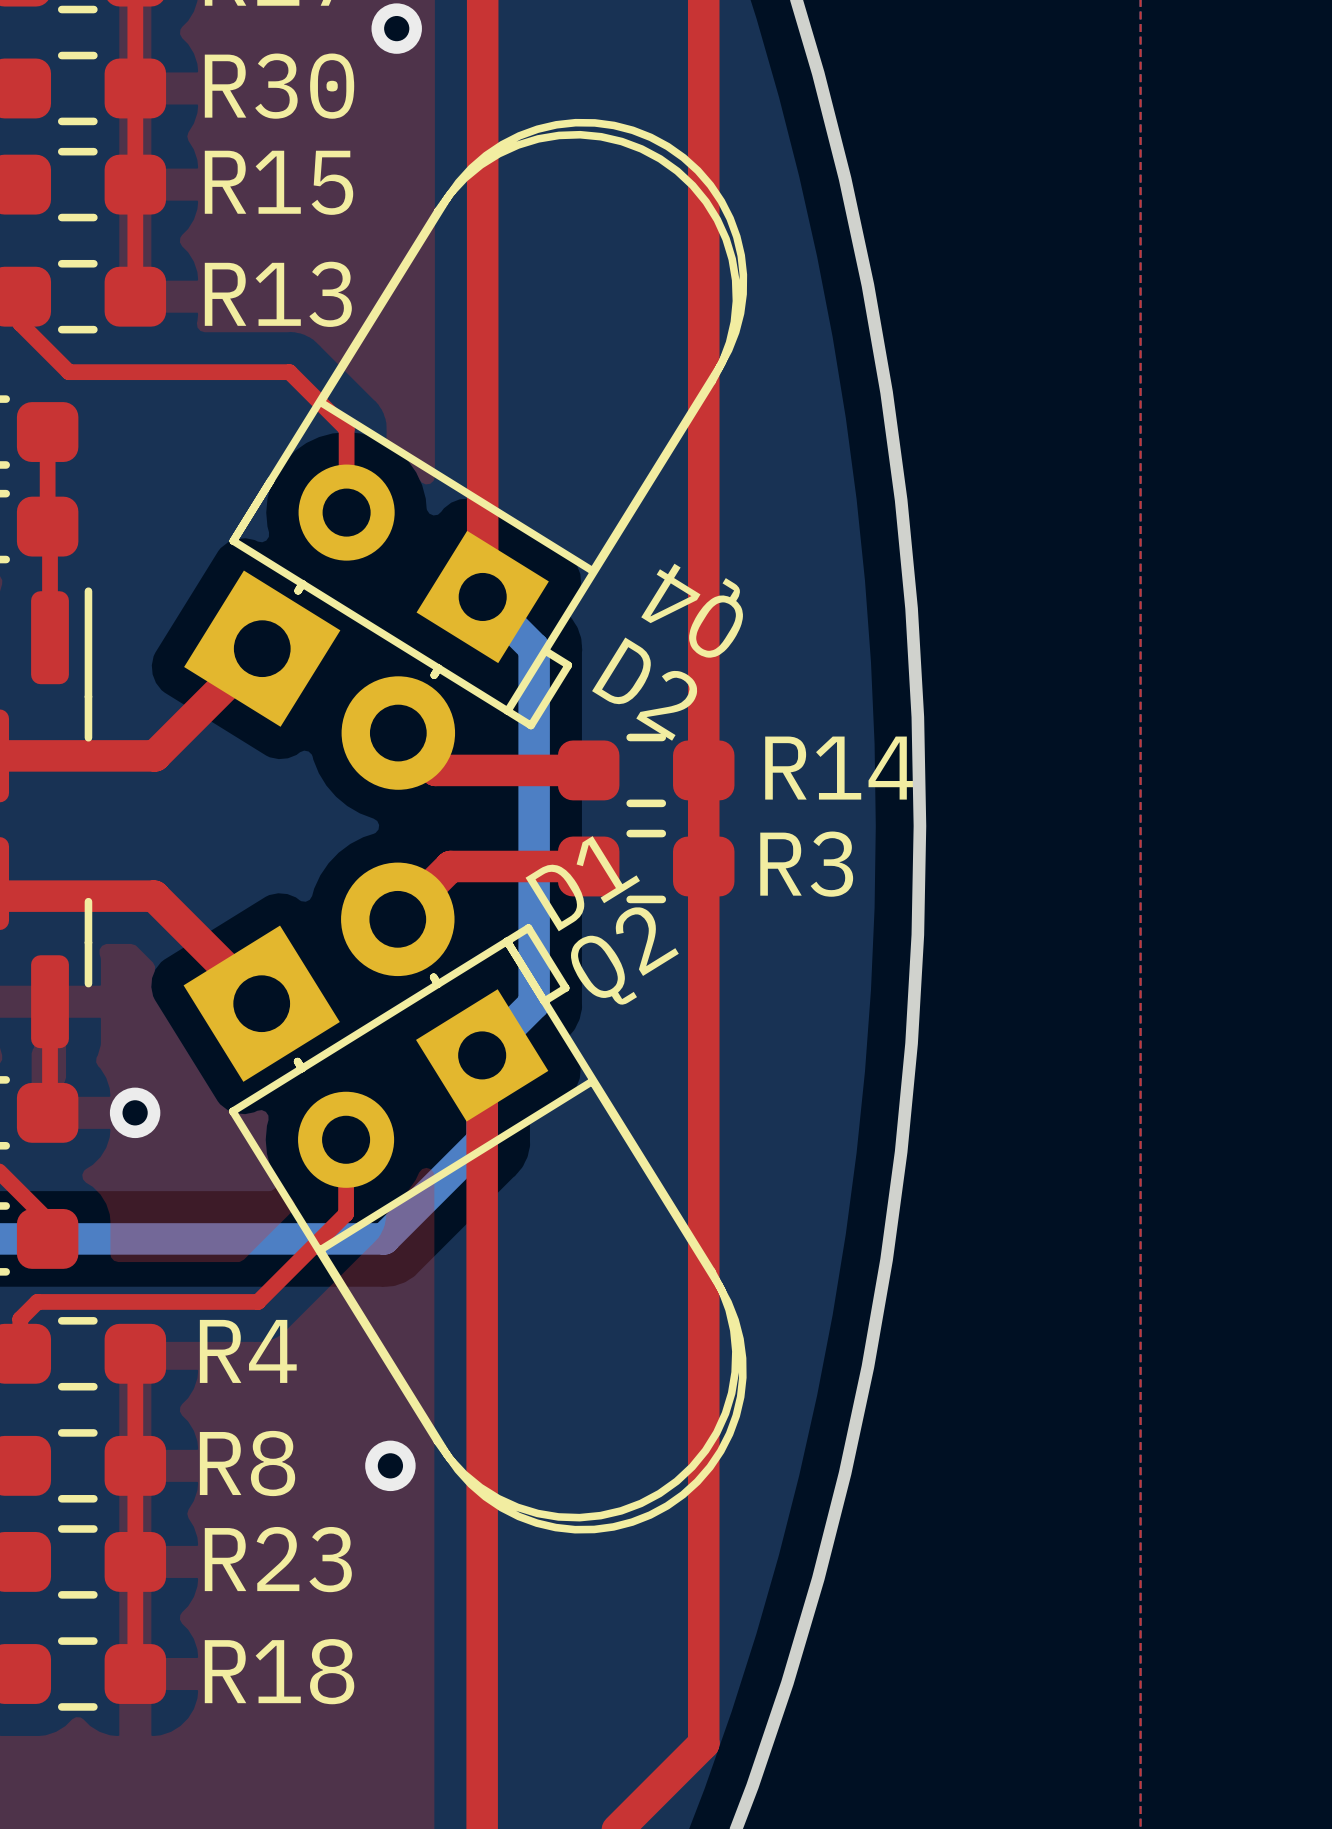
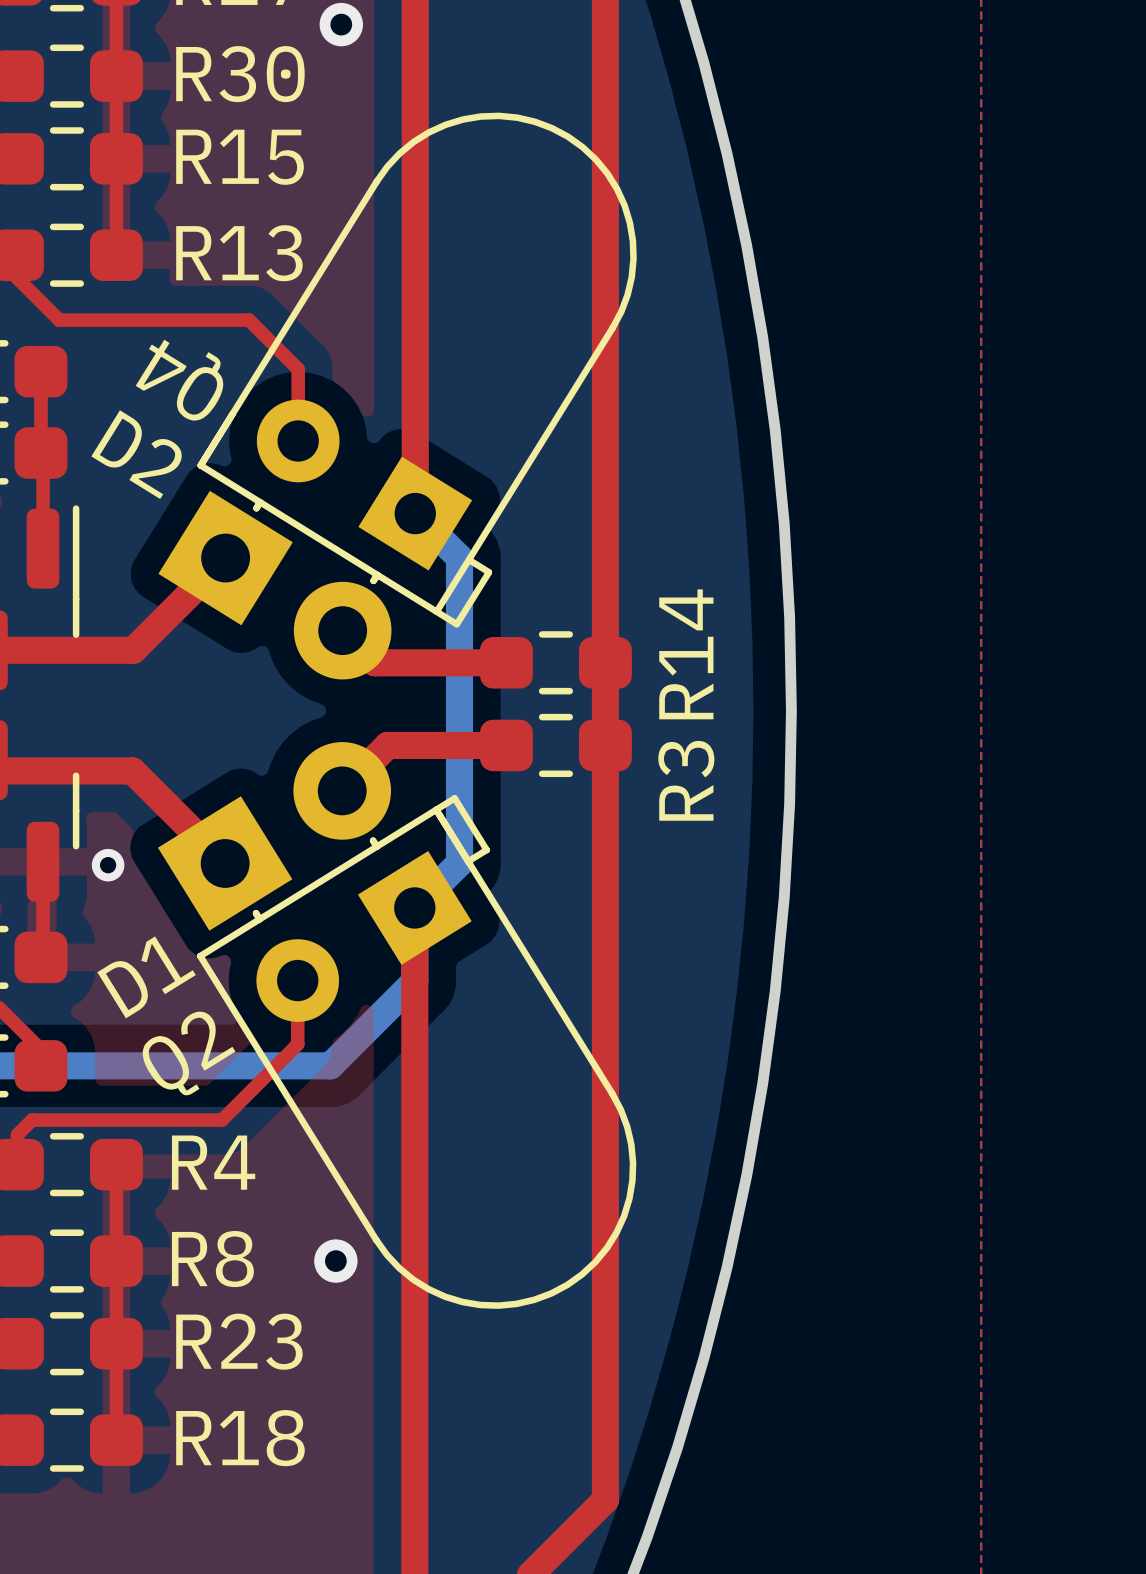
Q4 footprint: [298, 118, 748, 664] -> [256, 399, 473, 571]
Q4 name position: Q4 (692, 610) -> Q4 (179, 380)
D2 name position: D2 (644, 689) -> D2 (136, 454)
R14 name rotation: 0° (840, 768) -> 90° counterclockwise (686, 654)
R3 name rotation: 0° (806, 864) -> 90° counterclockwise (686, 780)
D1 name position: D1 (582, 883) -> D1 (146, 977)
Q2 name position: Q2 (624, 956) -> Q2 (189, 1053)
Q2 footprint: [298, 989, 747, 1534] -> [256, 851, 472, 1022]
via: none -> (108, 865)
via: (135, 1112) -> none

